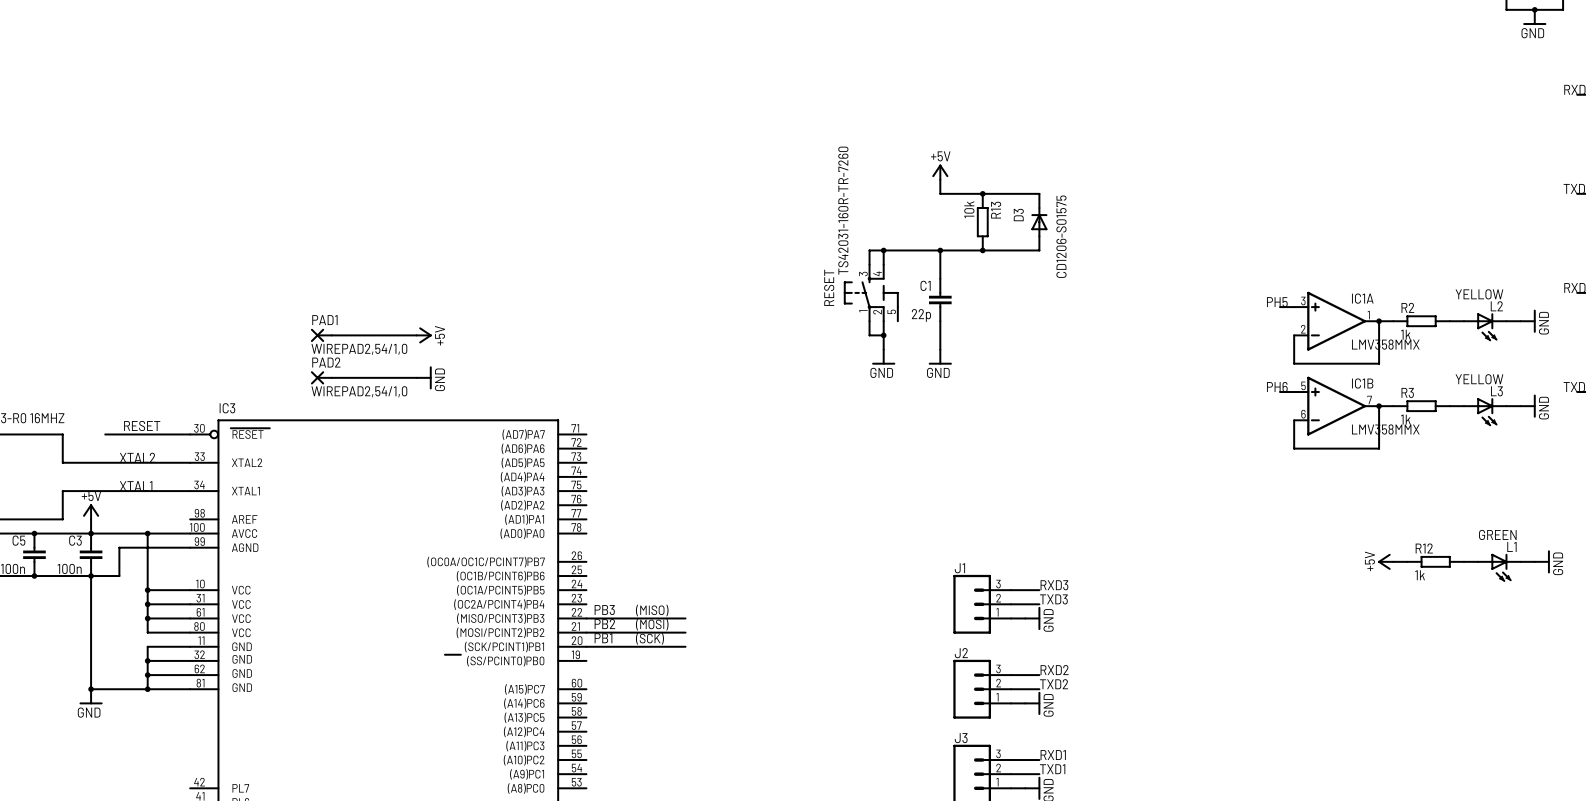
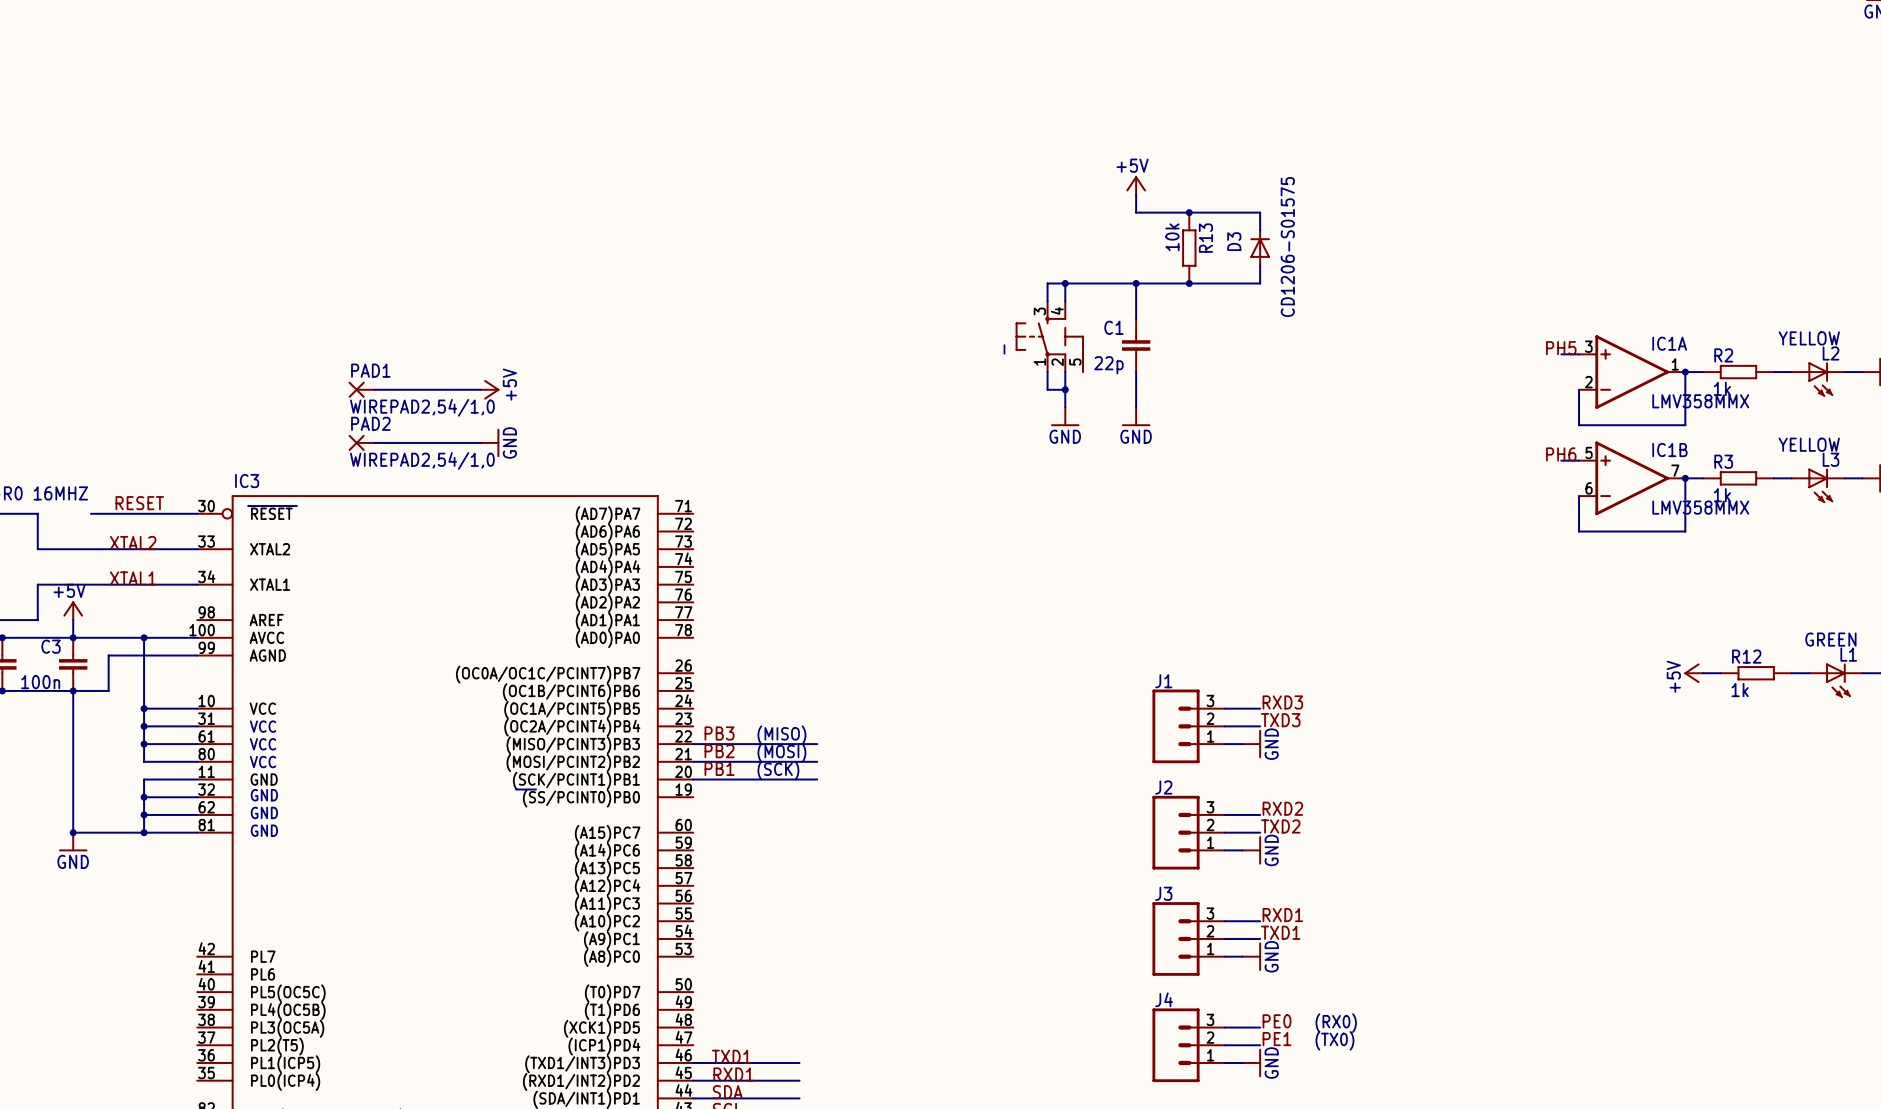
RESET value: TS42031-160R-TR-7260 (843, 210) -> none
RESET name: RESET (829, 287) -> _ (1004, 349)

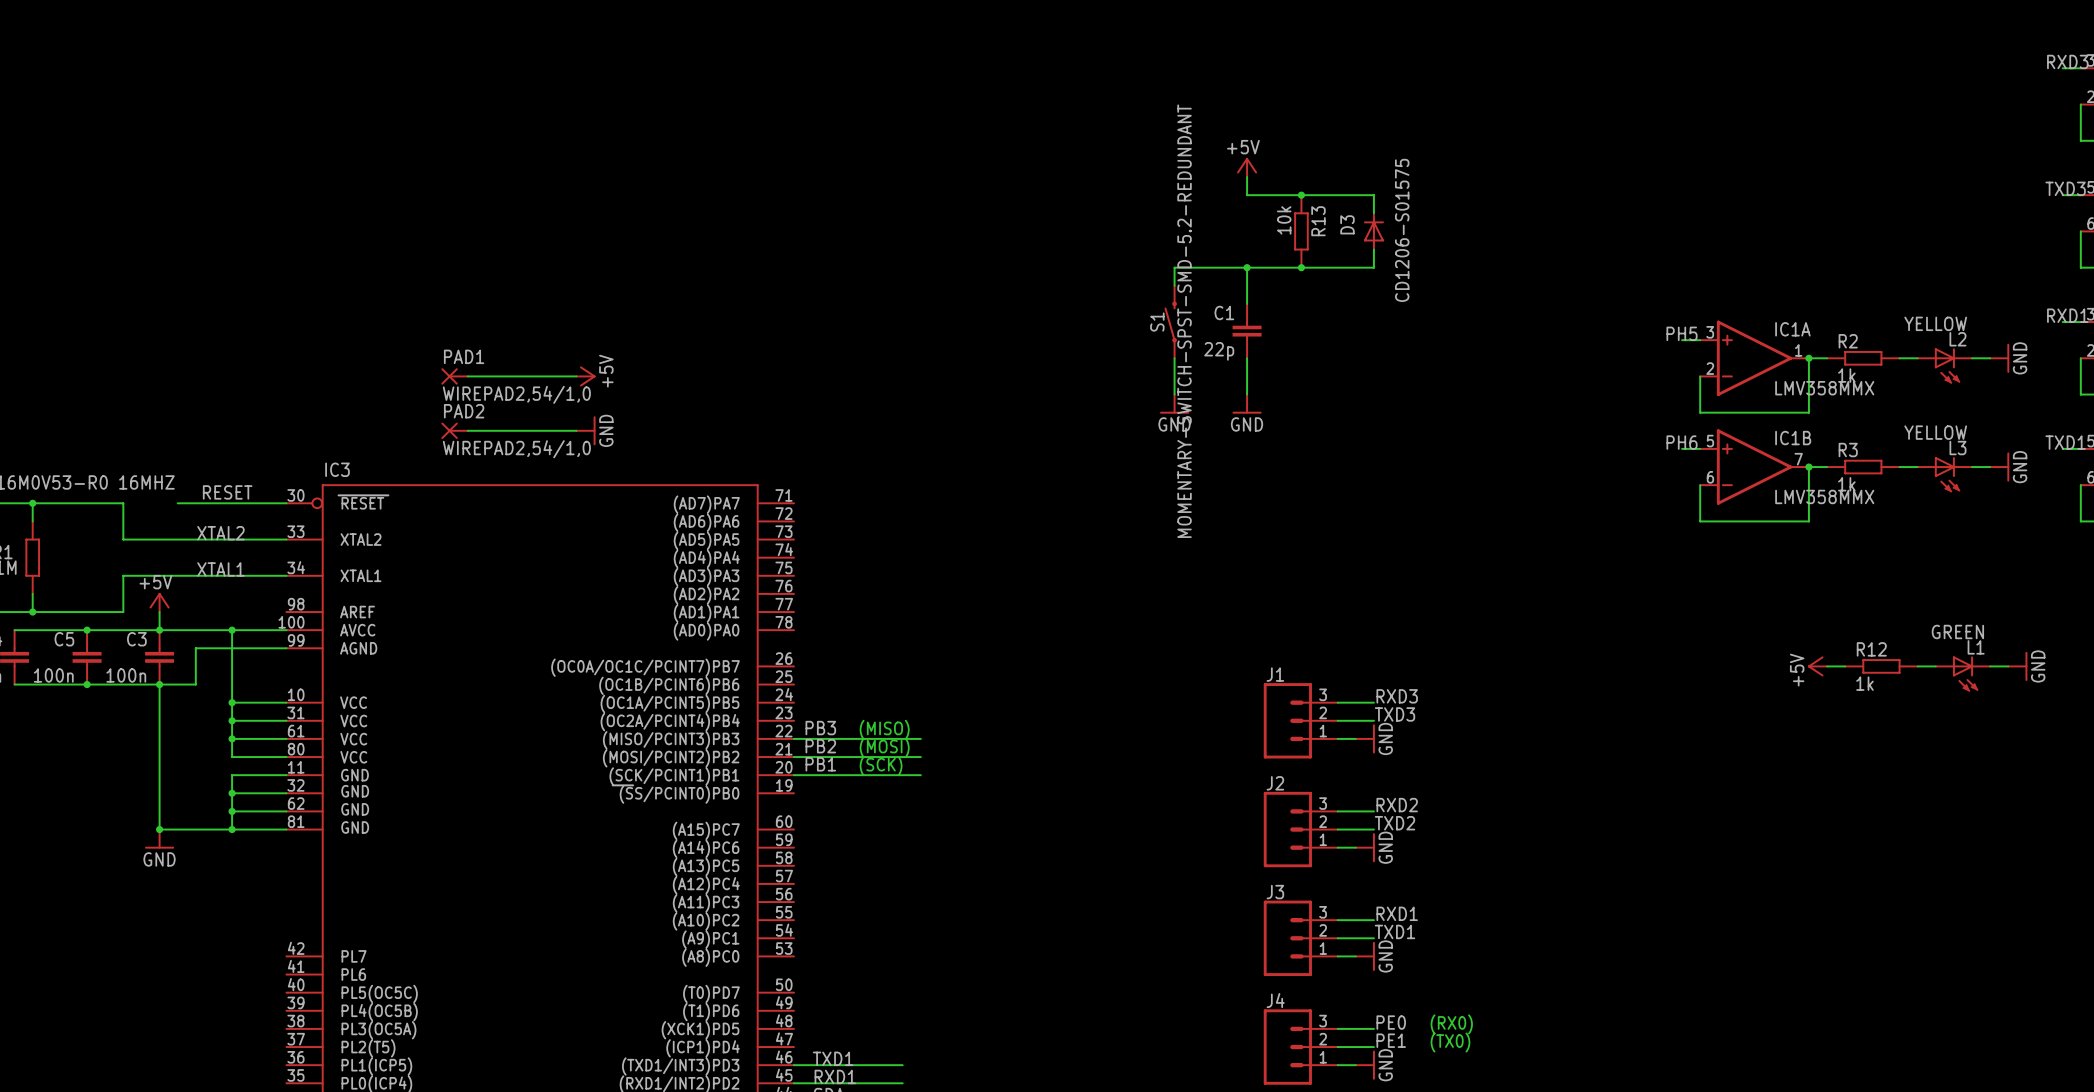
wire: (1065, 283) (1047, 283) (1047, 301) -> none
junction: (1065, 283) -> none
part: (1049, 336) -> none
S1: none -> MOMENTARY-SWITCH-SPST-SMD-5.2-REDUNDANT (1170, 322)
wire: (1047, 372) (1047, 389) (1065, 389) -> none
junction: (1065, 389) -> none

